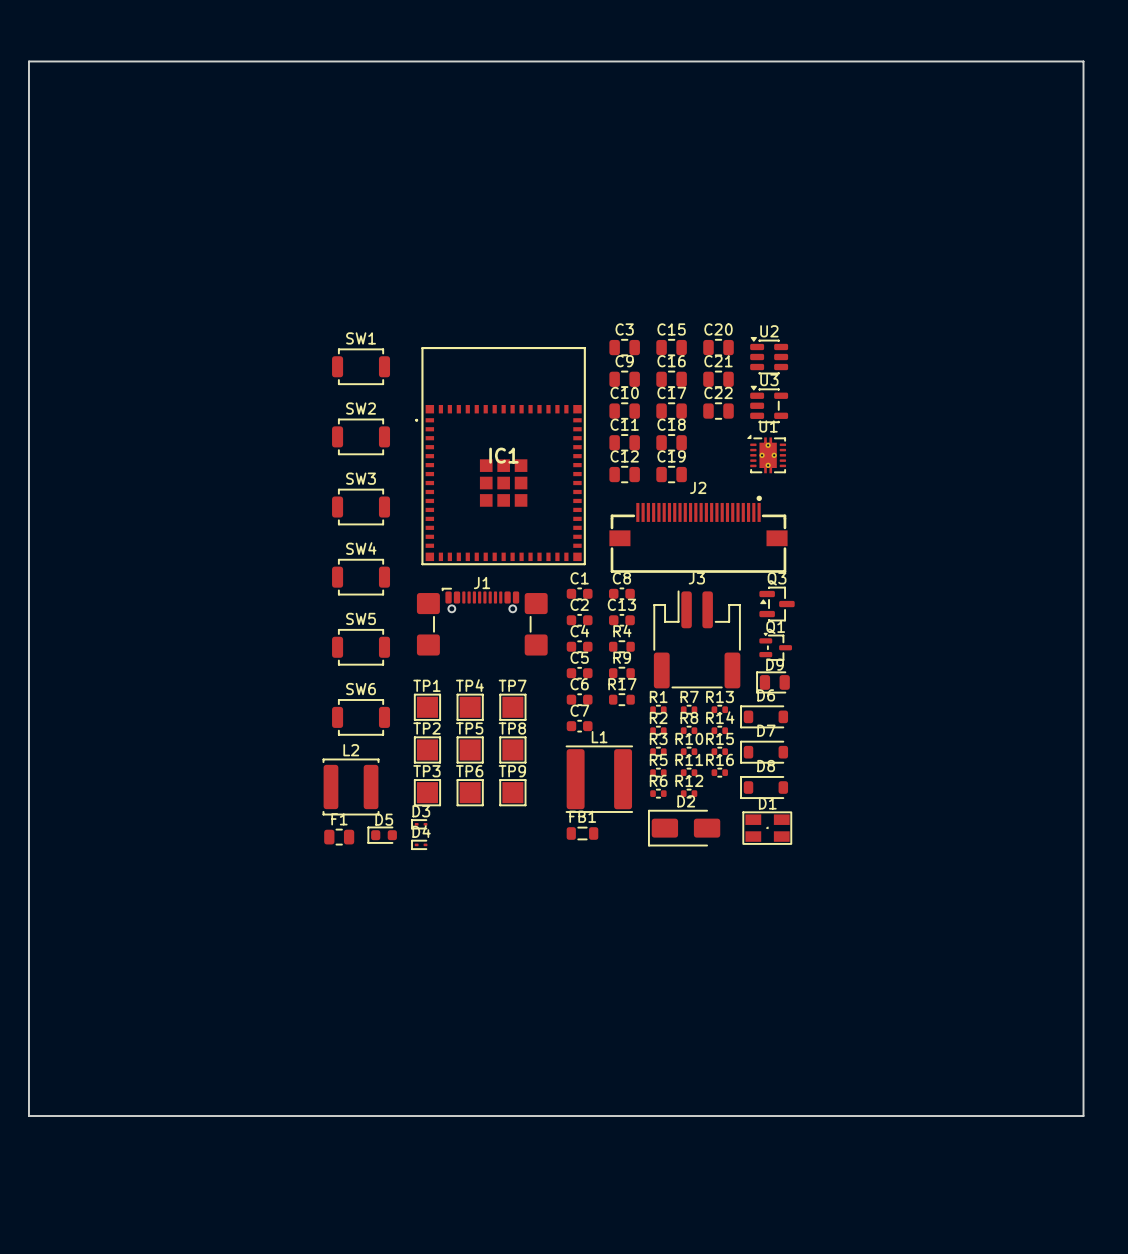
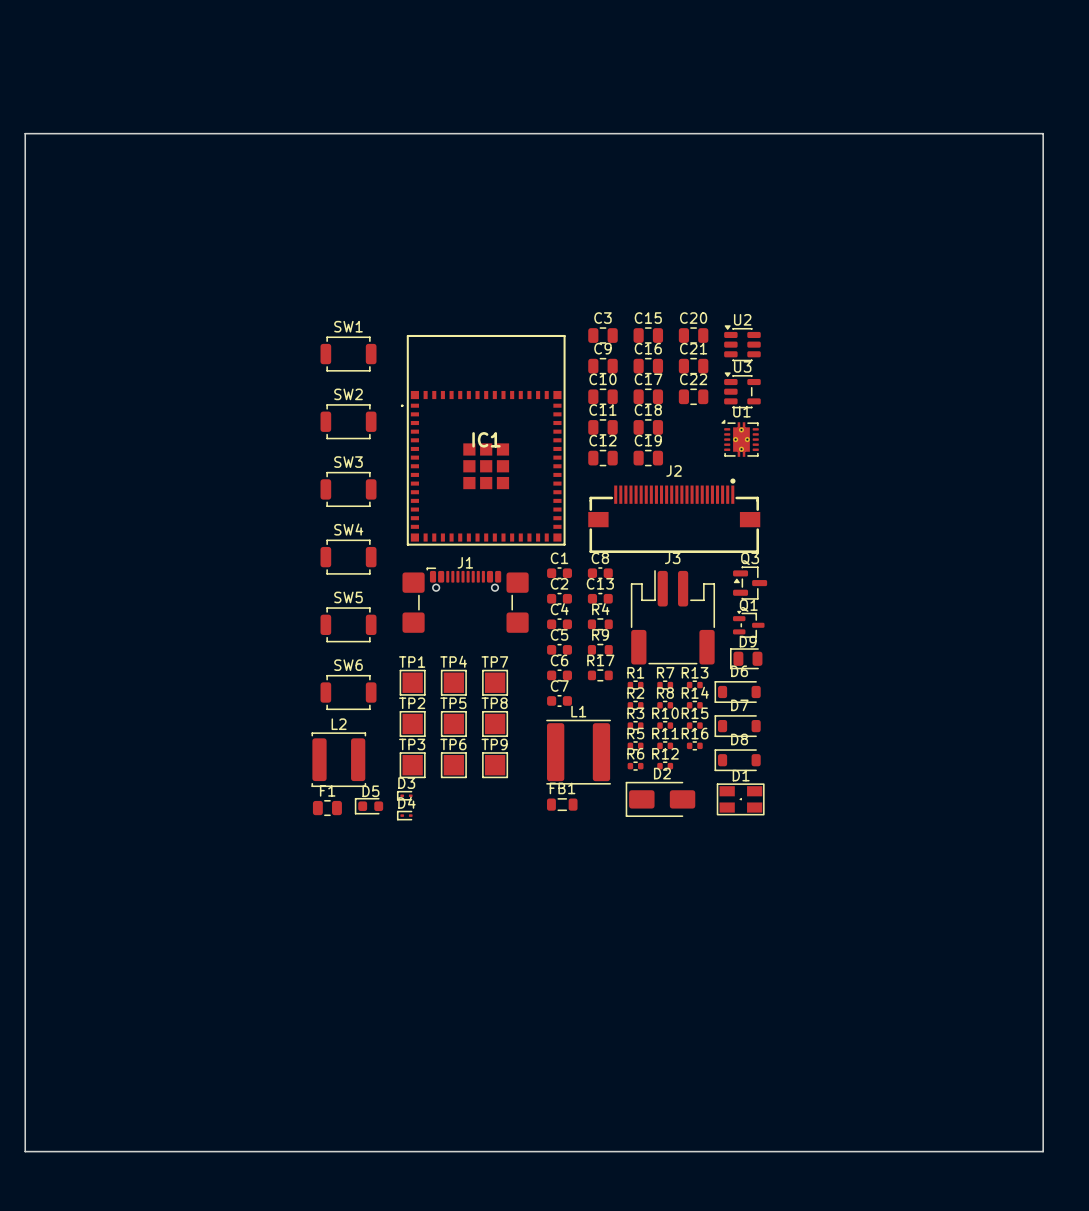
board edge: (28, 61) (1083, 61) (1083, 1116) (28, 1116) (28, 61) -> (25, 133) (25, 1151) (1043, 1151) (1043, 133) (25, 133)

